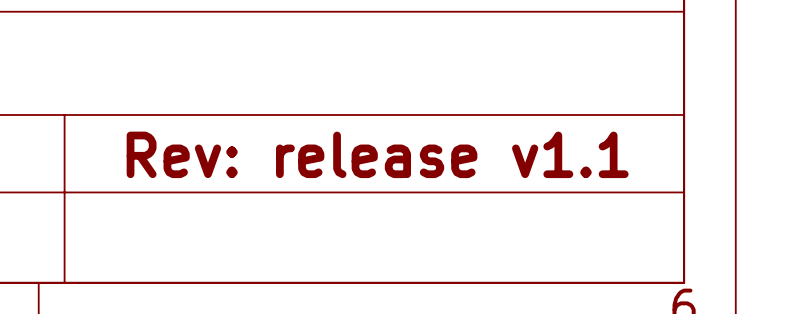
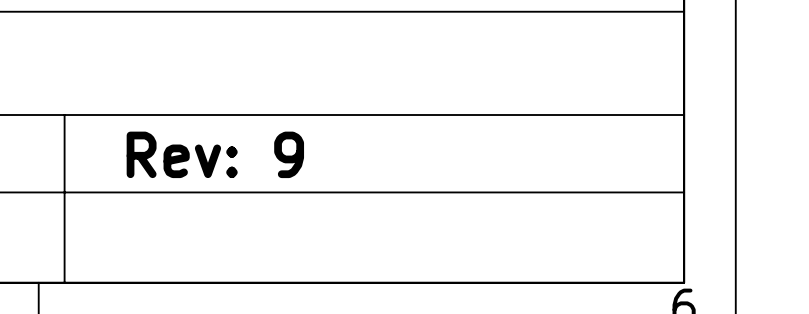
title block: Rev: release v1.1 (377, 154) -> Rev: 9 (215, 154)

